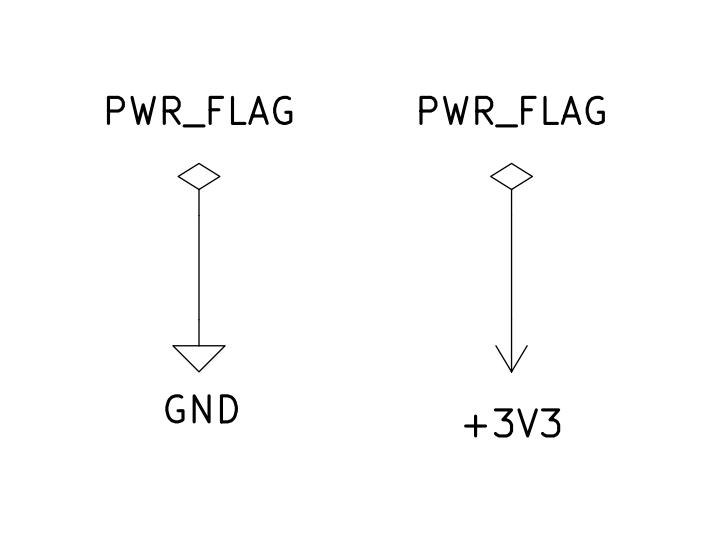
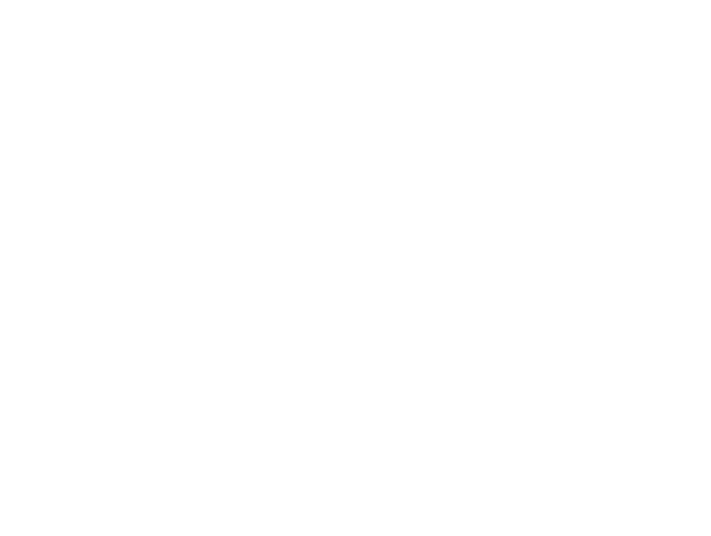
power symbol: PWR_FLAG (199, 189) -> none
power symbol: PWR_FLAG (511, 189) -> none
wire: (199, 215) (199, 319) -> none
wire: (511, 215) (511, 319) -> none
power symbol: GND (199, 345) -> none
power symbol: +3V3 (511, 345) -> none

